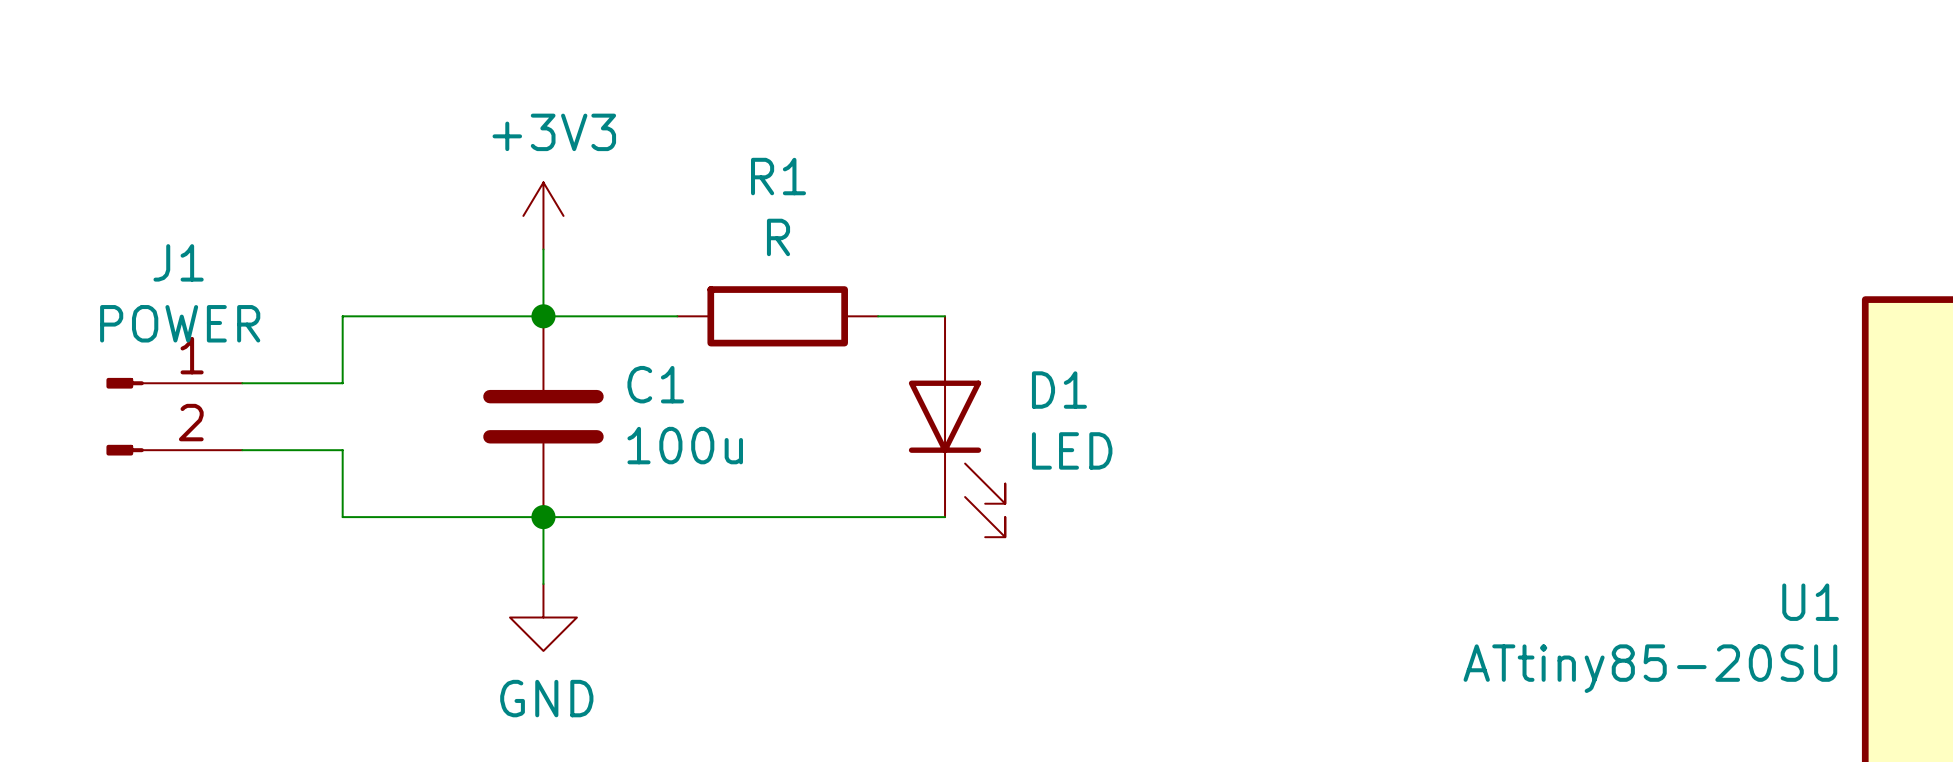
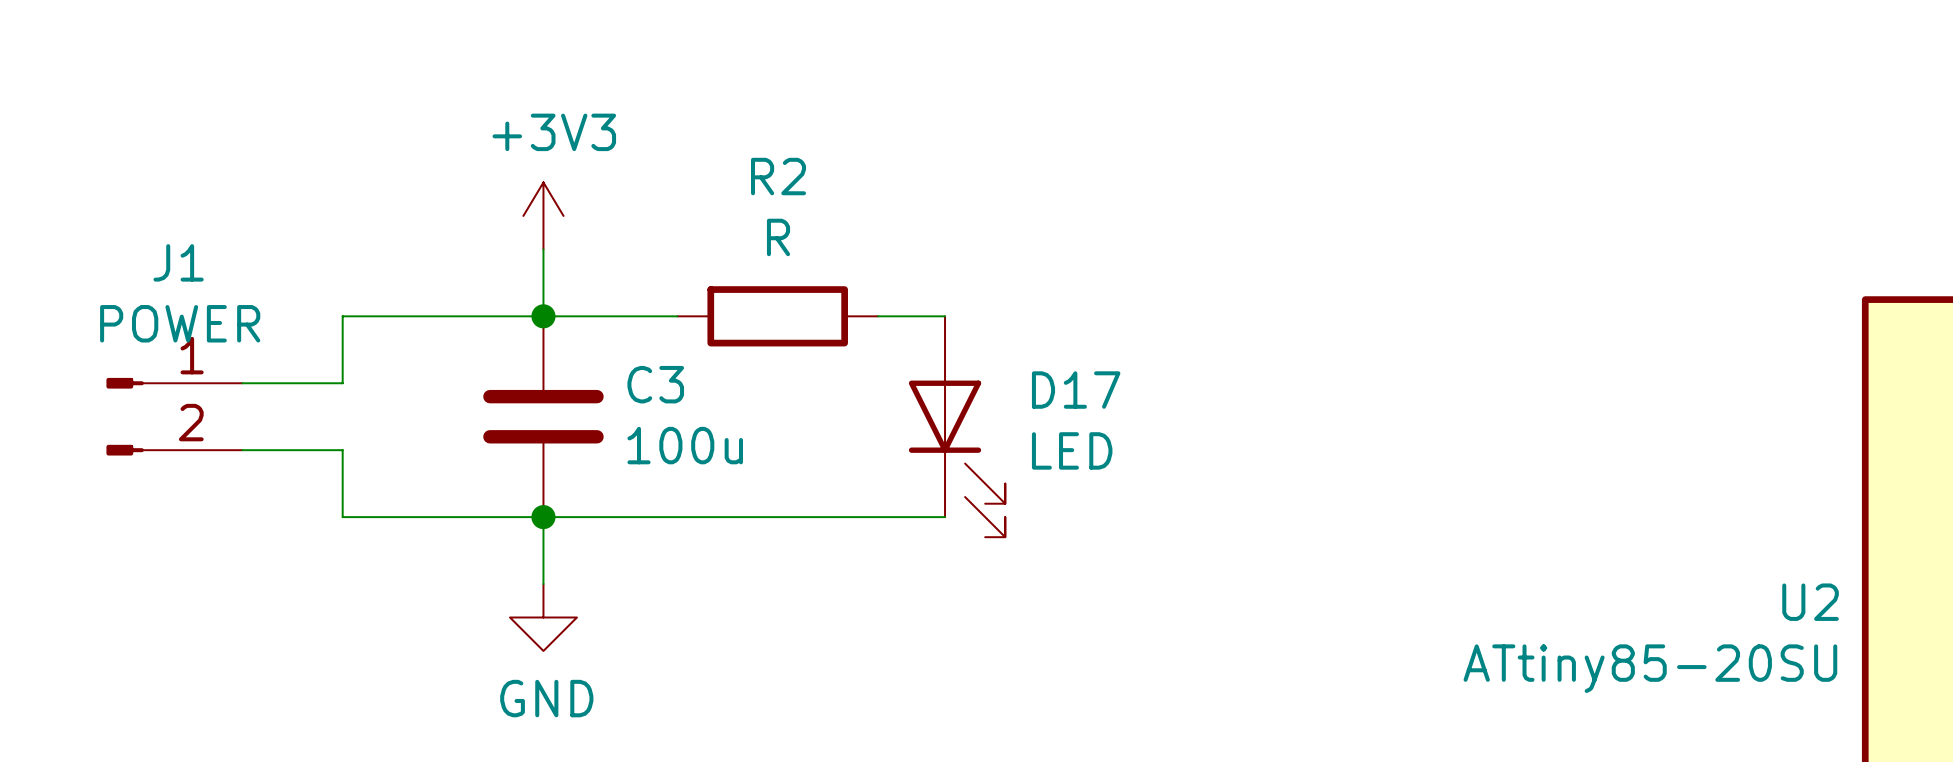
R1 name: R1 (778, 176) -> R2 (778, 176)
C1 name: C1 (655, 384) -> C3 (655, 384)
D1 name: D1 (1059, 390) -> D17 (1076, 390)
U1 name: U1 (1810, 602) -> U2 (1810, 602)

